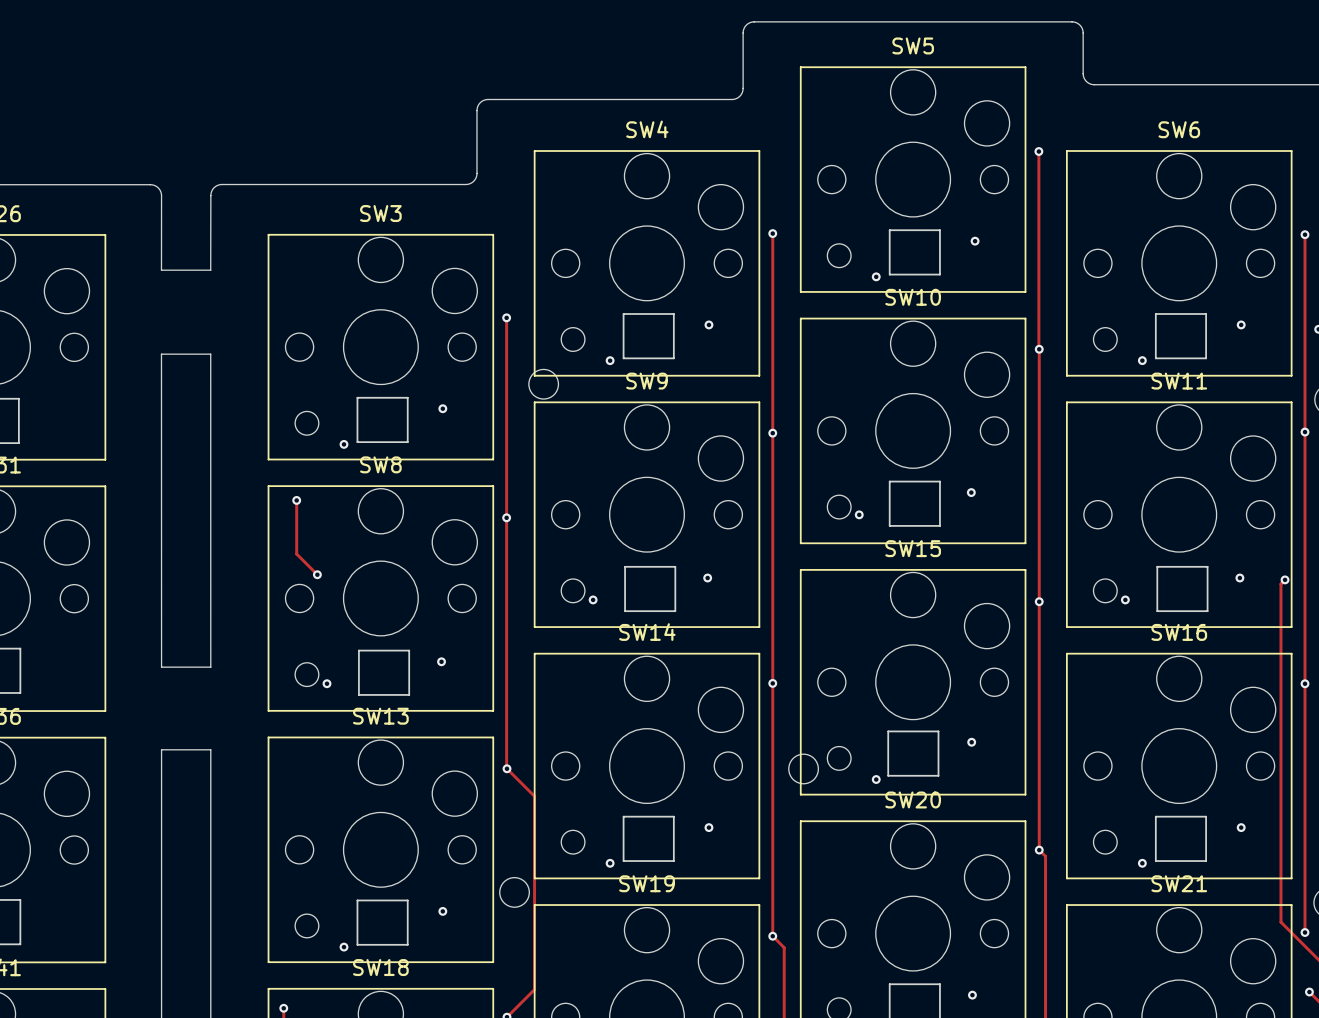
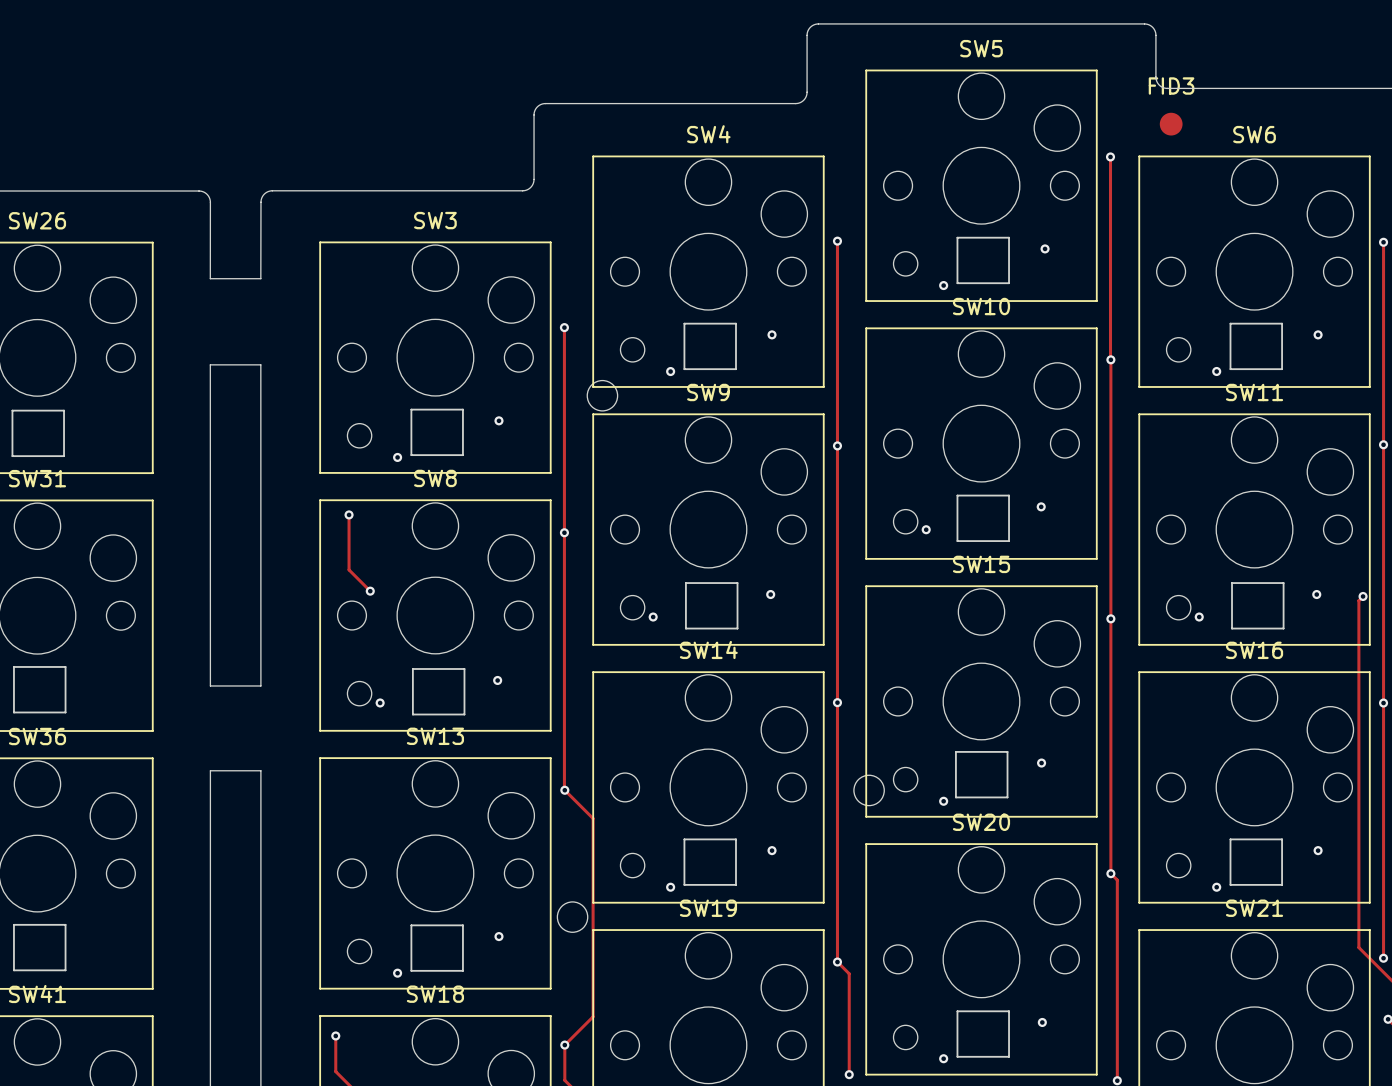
FID3: none -> (1171, 124)

